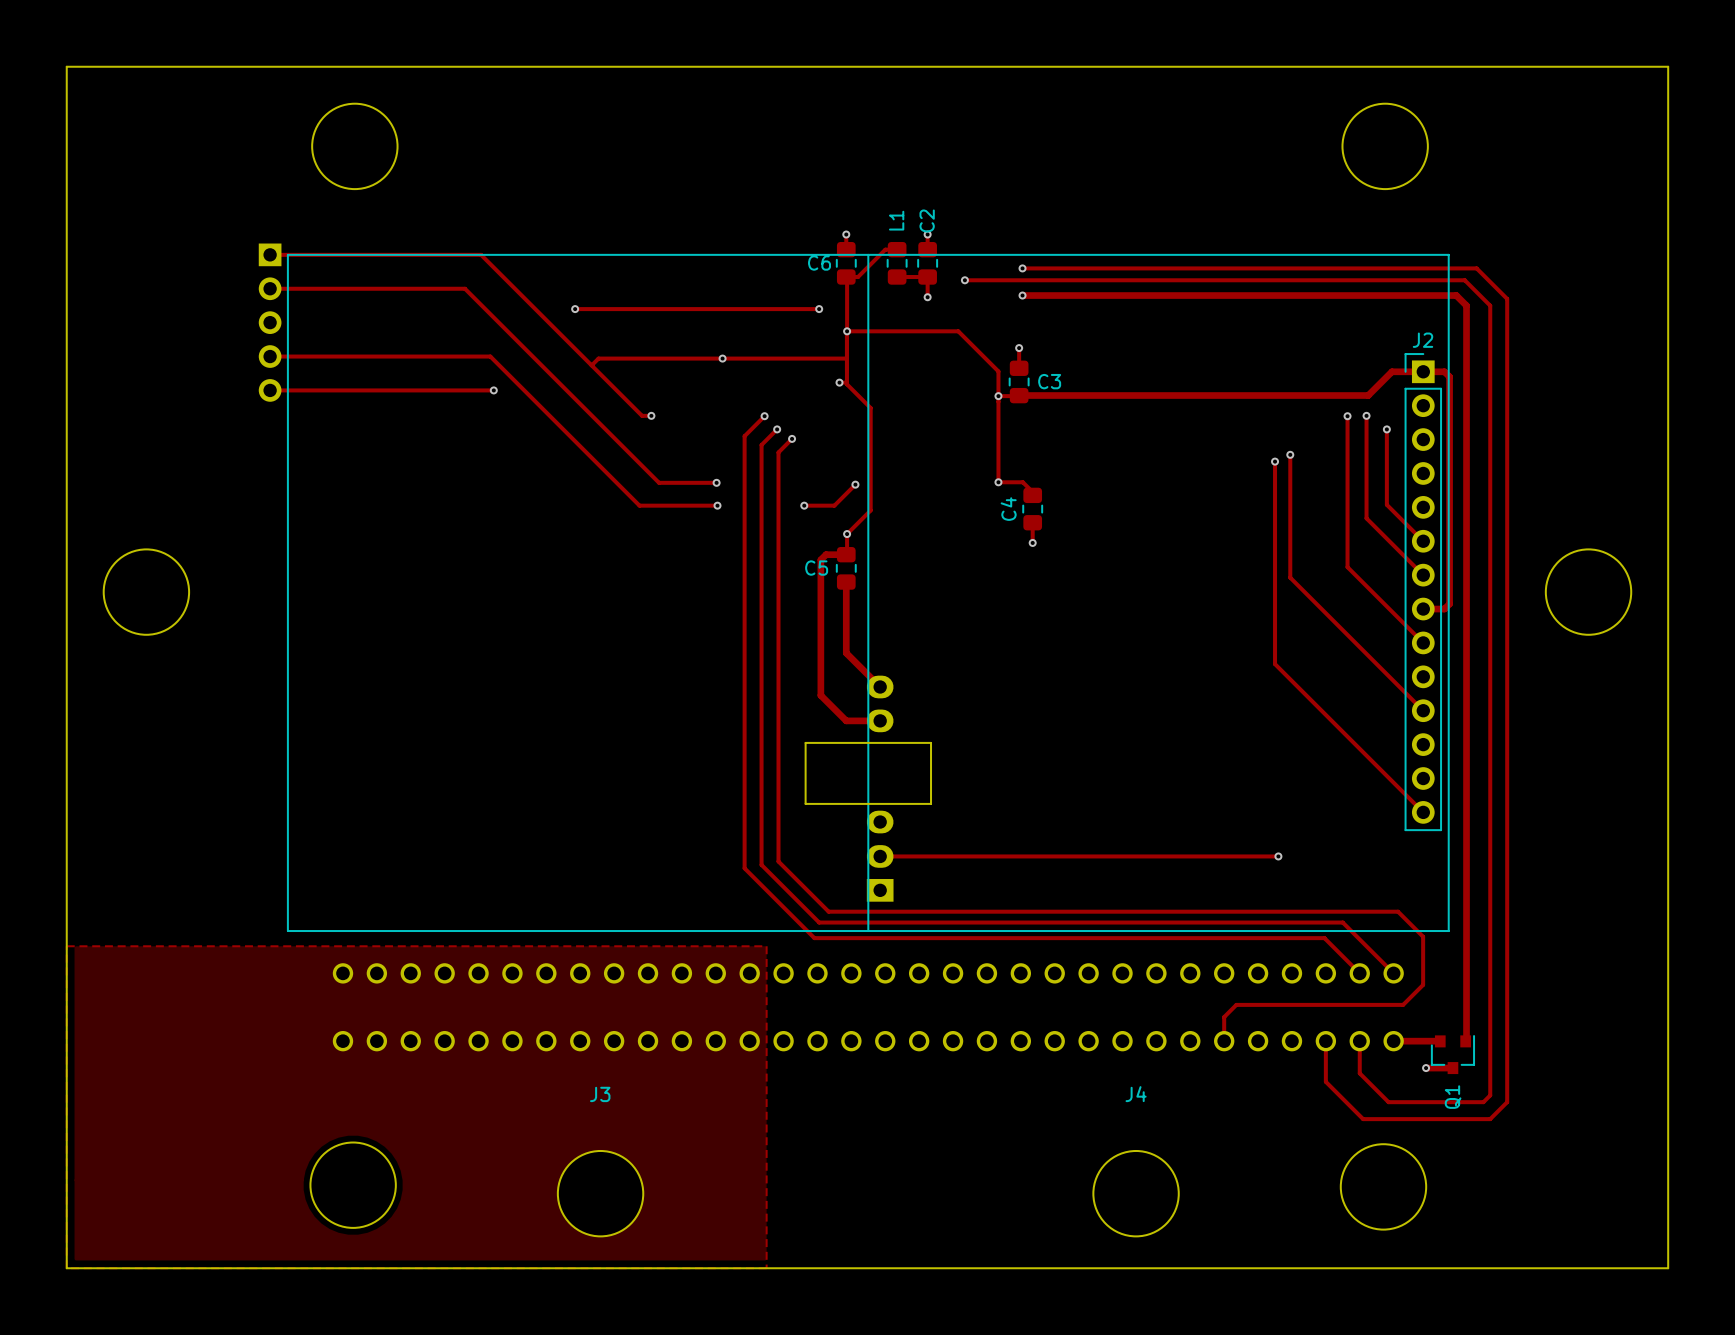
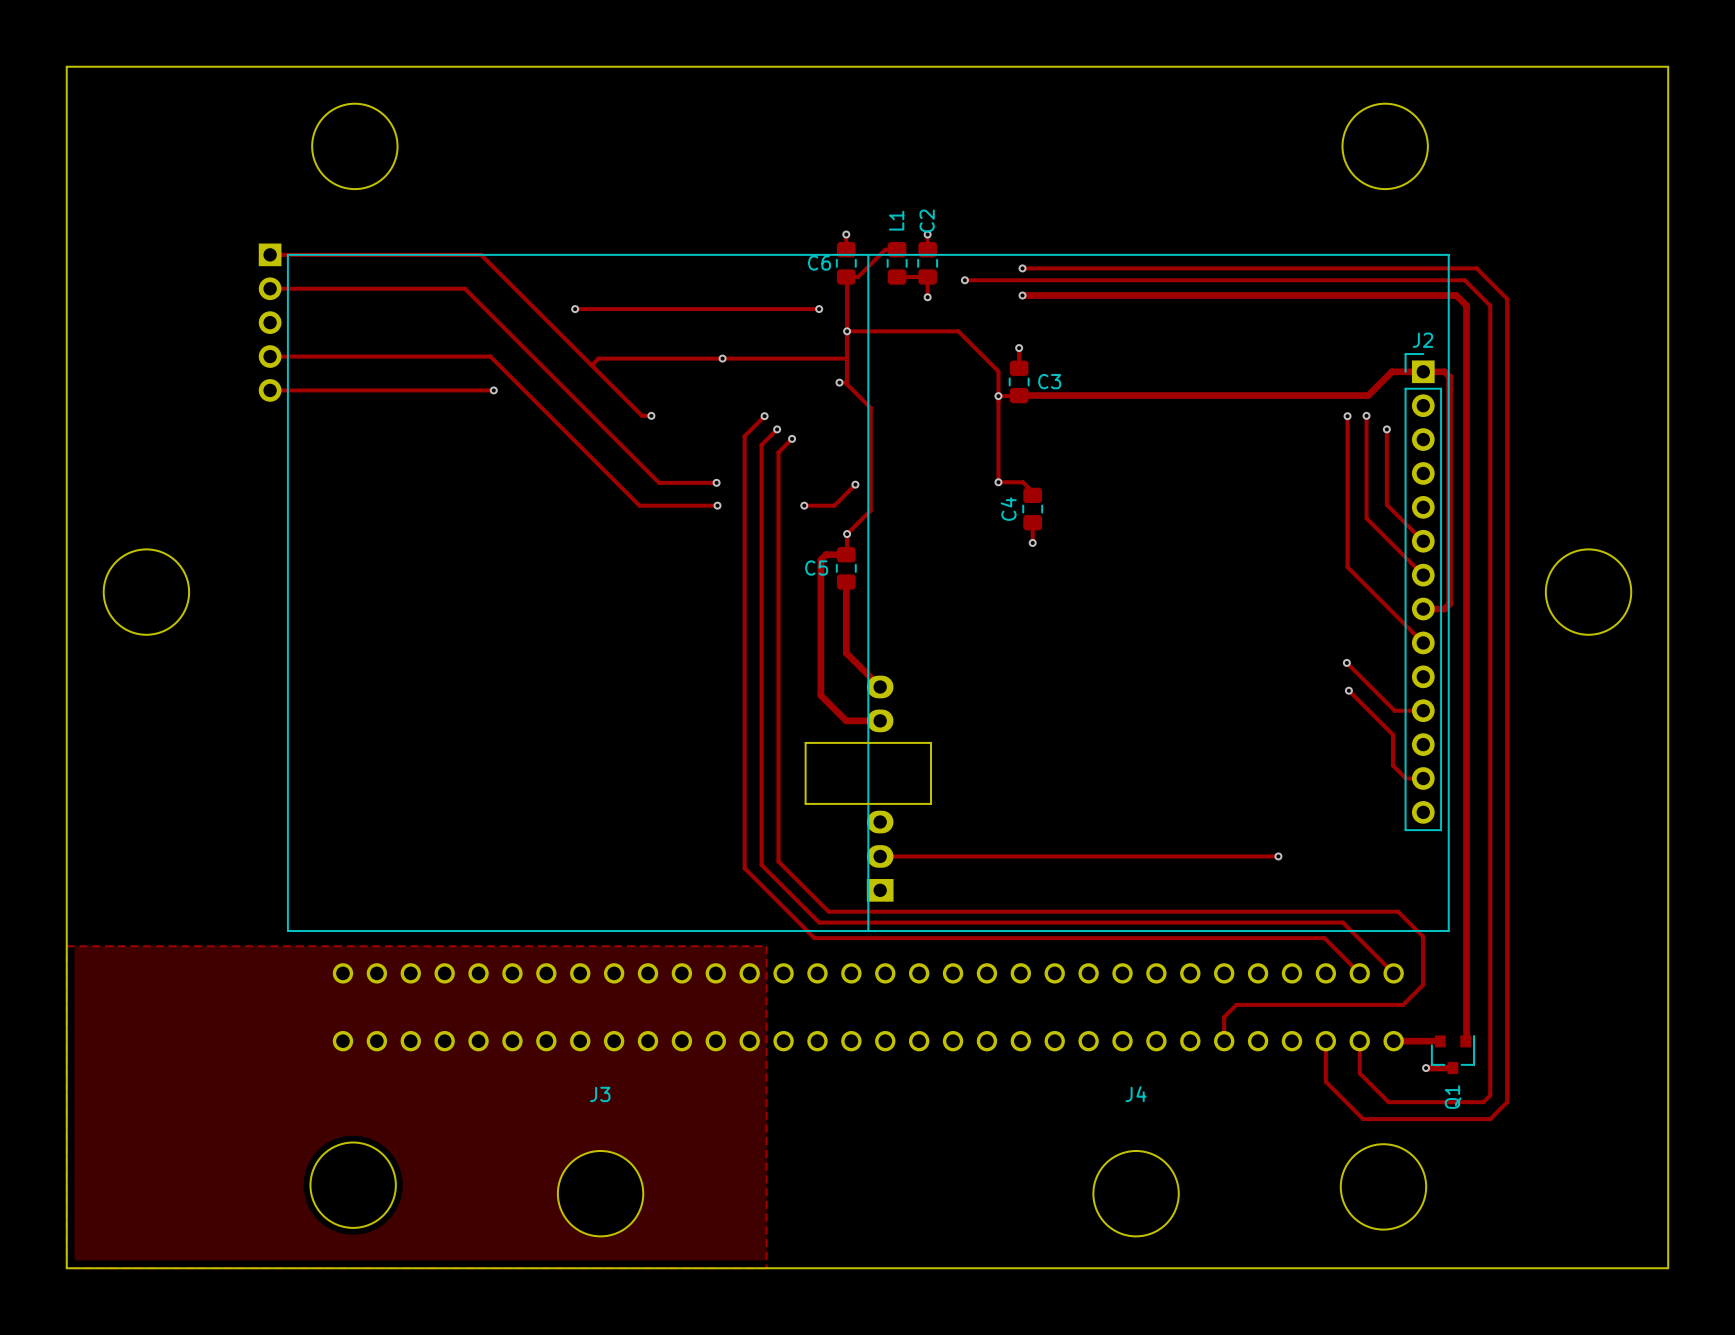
track: (1290, 454) (1290, 577) (1423, 710) -> (1346, 662) (1394, 710) (1423, 710)
via: (1290, 454) -> none
track: (1275, 461) (1275, 664) (1423, 812) -> none
via: (1275, 461) -> none
via: none -> (1346, 662)
track: none -> (1348, 690) (1392, 734) (1392, 765) (1405, 778) (1423, 778)
via: none -> (1348, 690)

